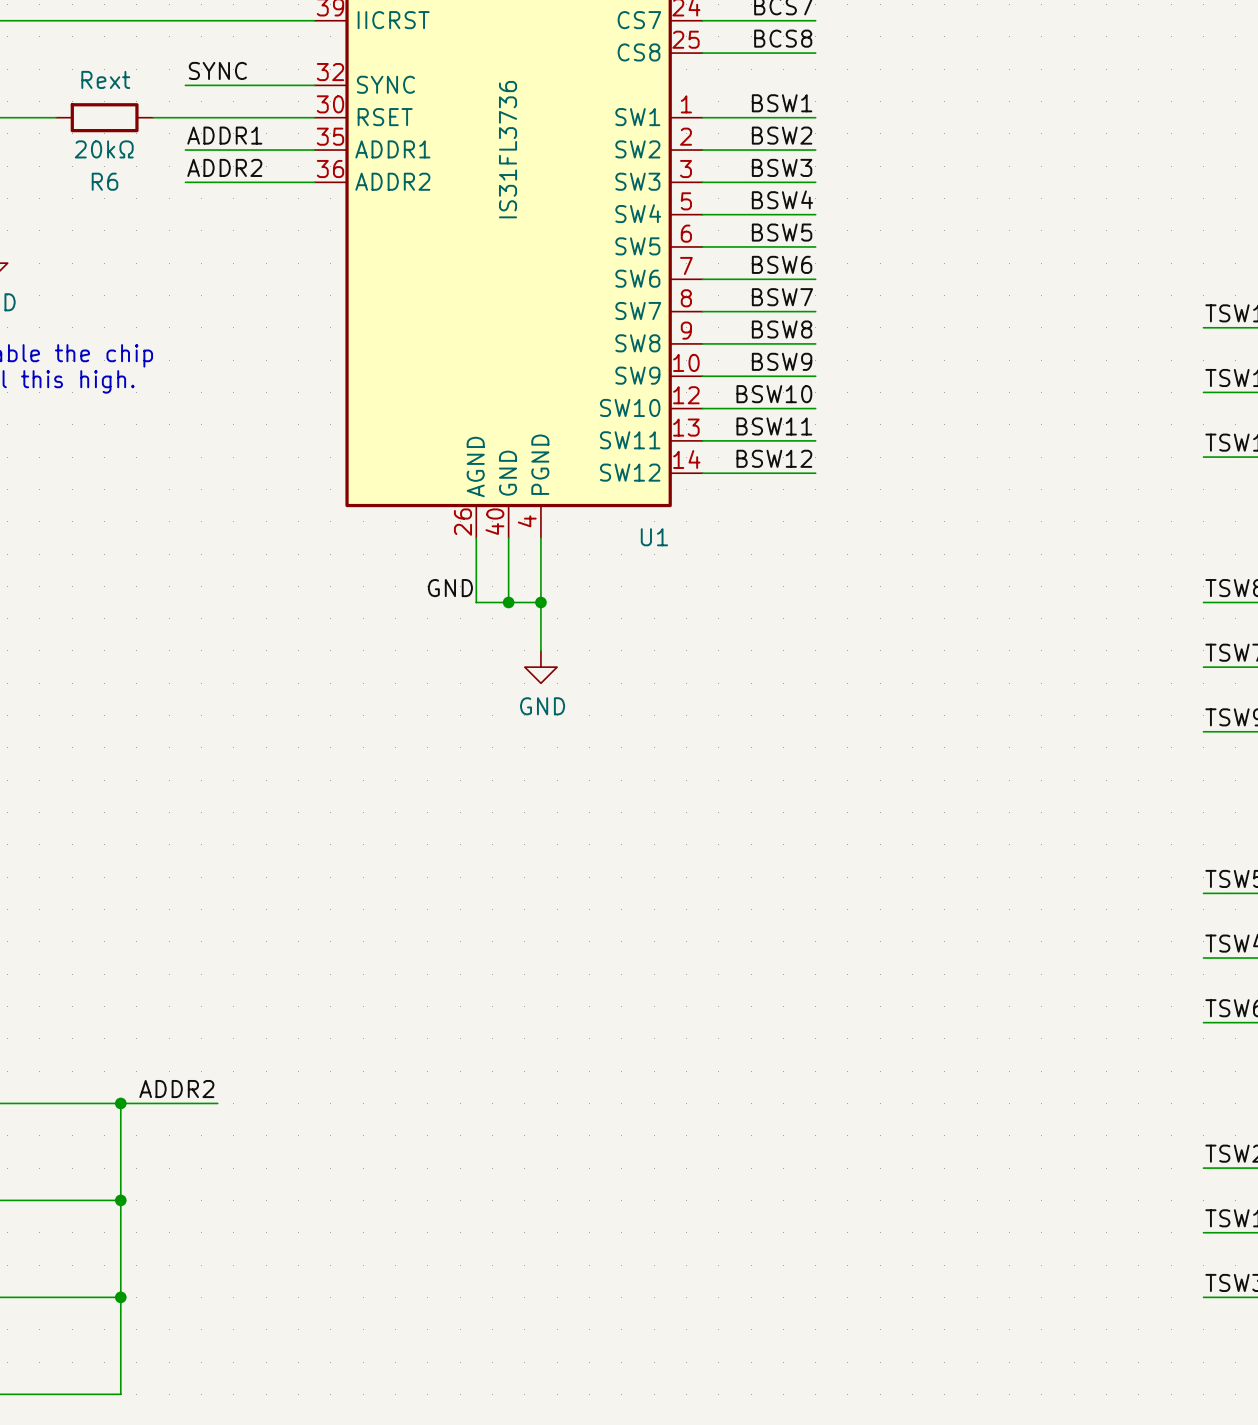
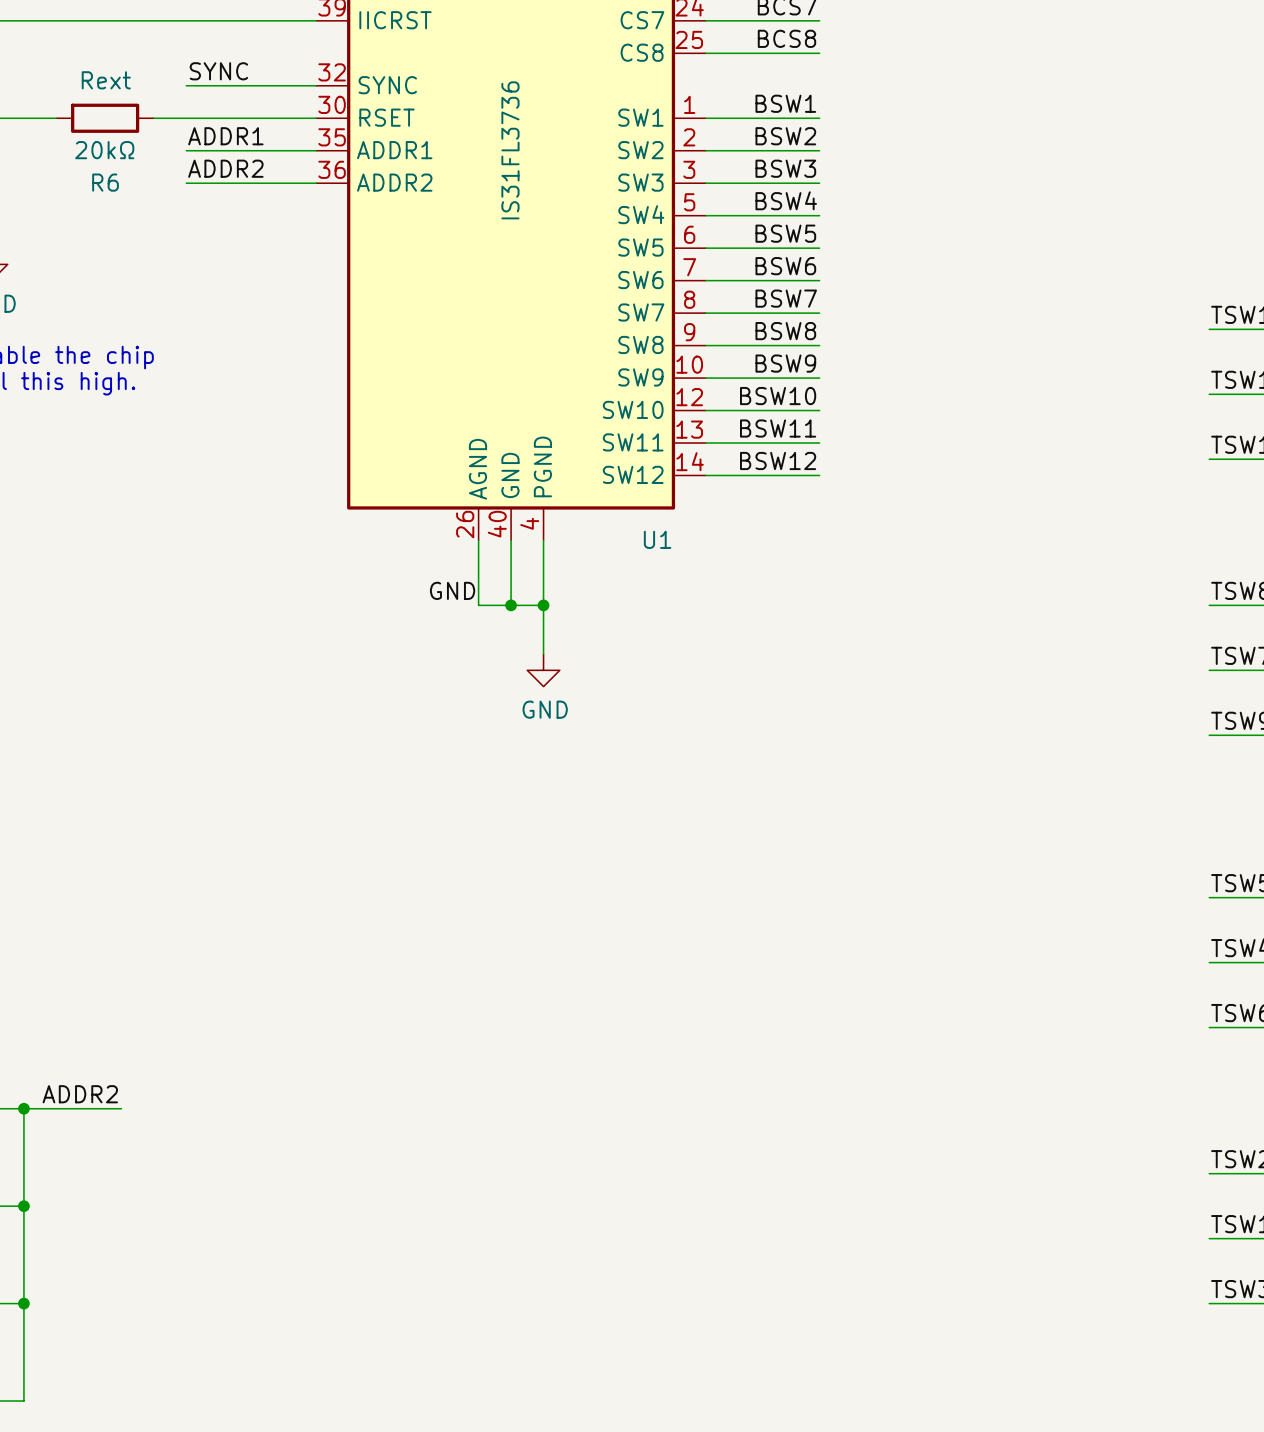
label position: ADDR2 (176, 1089) -> ADDR2 (80, 1094)
junction: none -> (23, 1108)
junction: (120, 1103) -> none
wire: (217, 1103) (120, 1103) (120, 1394) (23, 1394) -> (23, 1108) (23, 1401)
wire: (23, 1200) (120, 1200) -> none
junction: none -> (23, 1206)
junction: (120, 1200) -> none
wire: (23, 1297) (120, 1297) -> none
junction: none -> (23, 1303)
junction: (120, 1297) -> none

